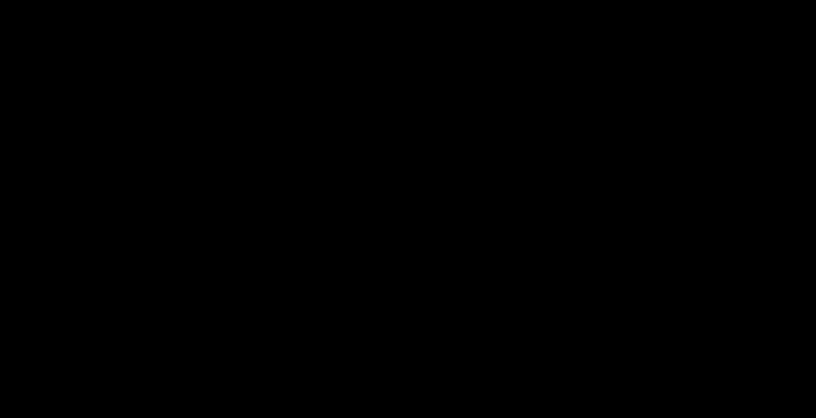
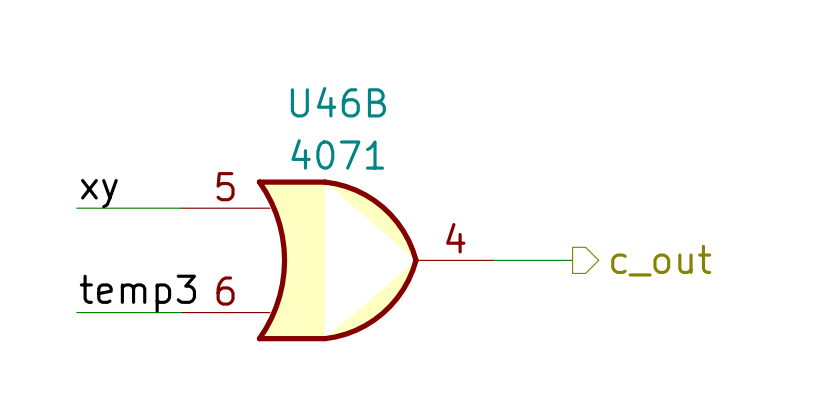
label: none -> xy (99, 193)
wire: none -> (76, 208) (181, 208)
U46B: none -> 4071 (337, 260)
wire: none -> (494, 260) (572, 260)
hierarchical label: none -> c_out (661, 260)
label: none -> temp3 (137, 293)
wire: none -> (76, 312) (181, 312)

